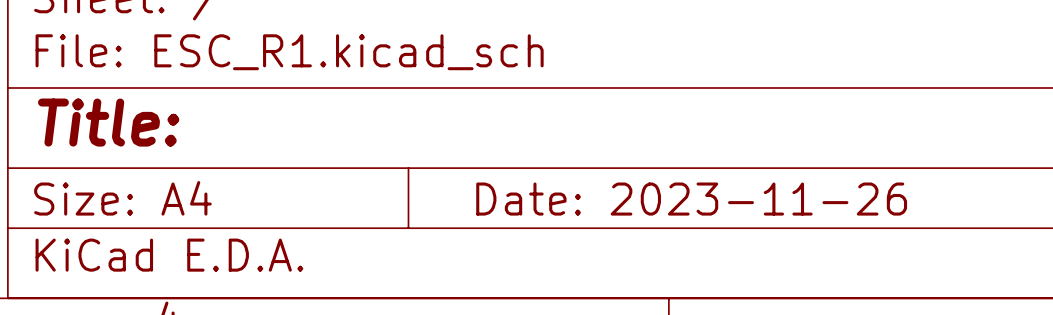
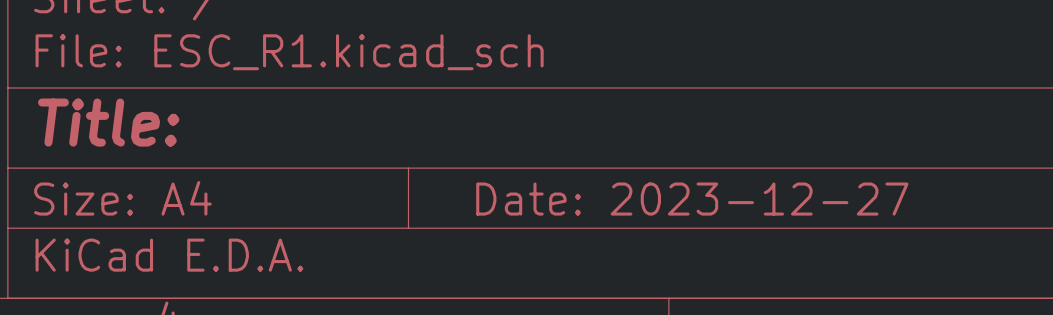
title block: Date: 2023-11-26 (691, 199) -> Date: 2023-12-27 (692, 199)

